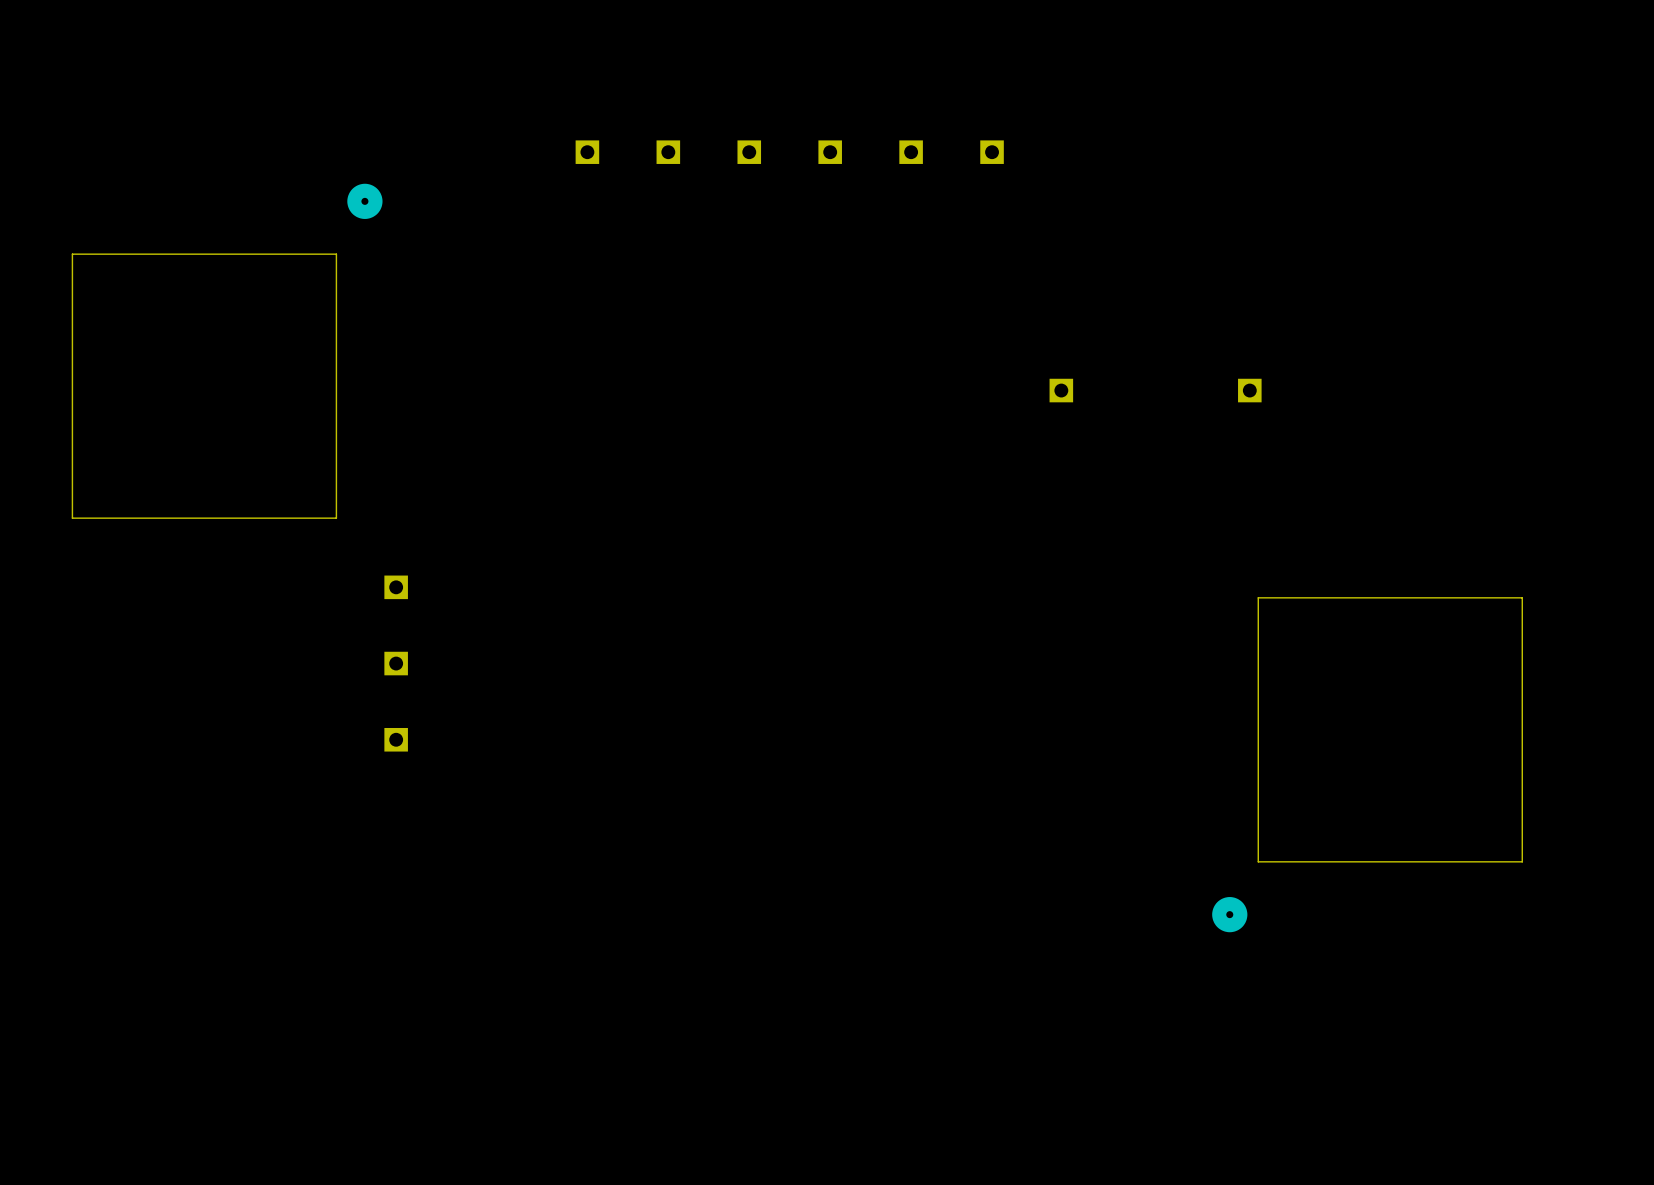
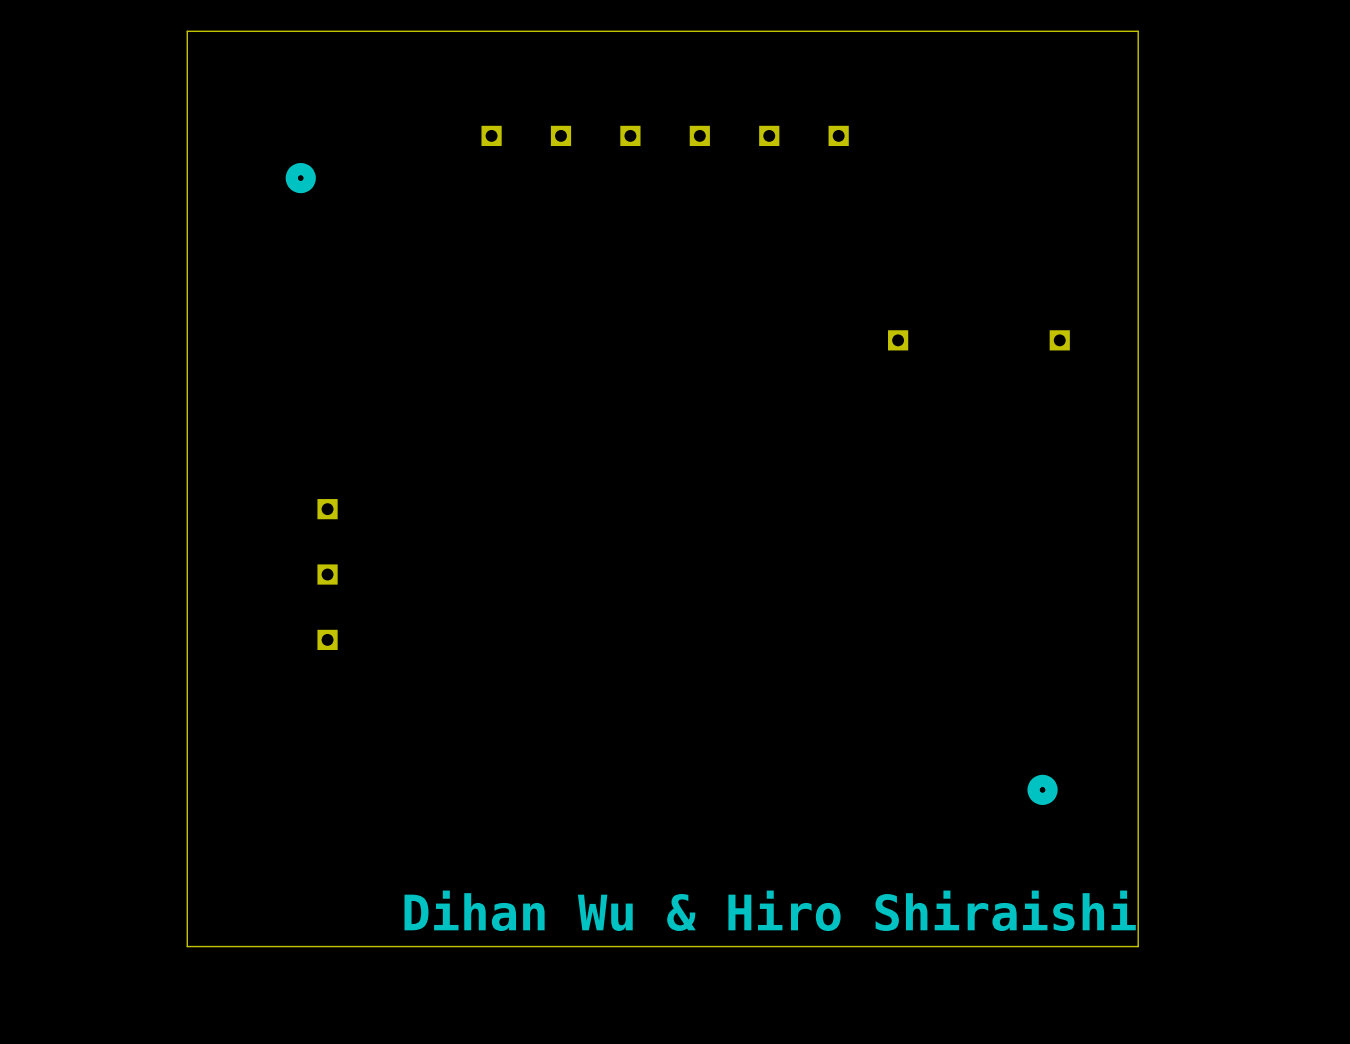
board edge: none -> (1138, 31) (187, 31) (187, 946) (1138, 946) (1138, 31)
part: (227, 351) -> none
part: (1367, 764) -> none
text: none -> Dihan Wu & Hiro Shiraishi (770, 910)

